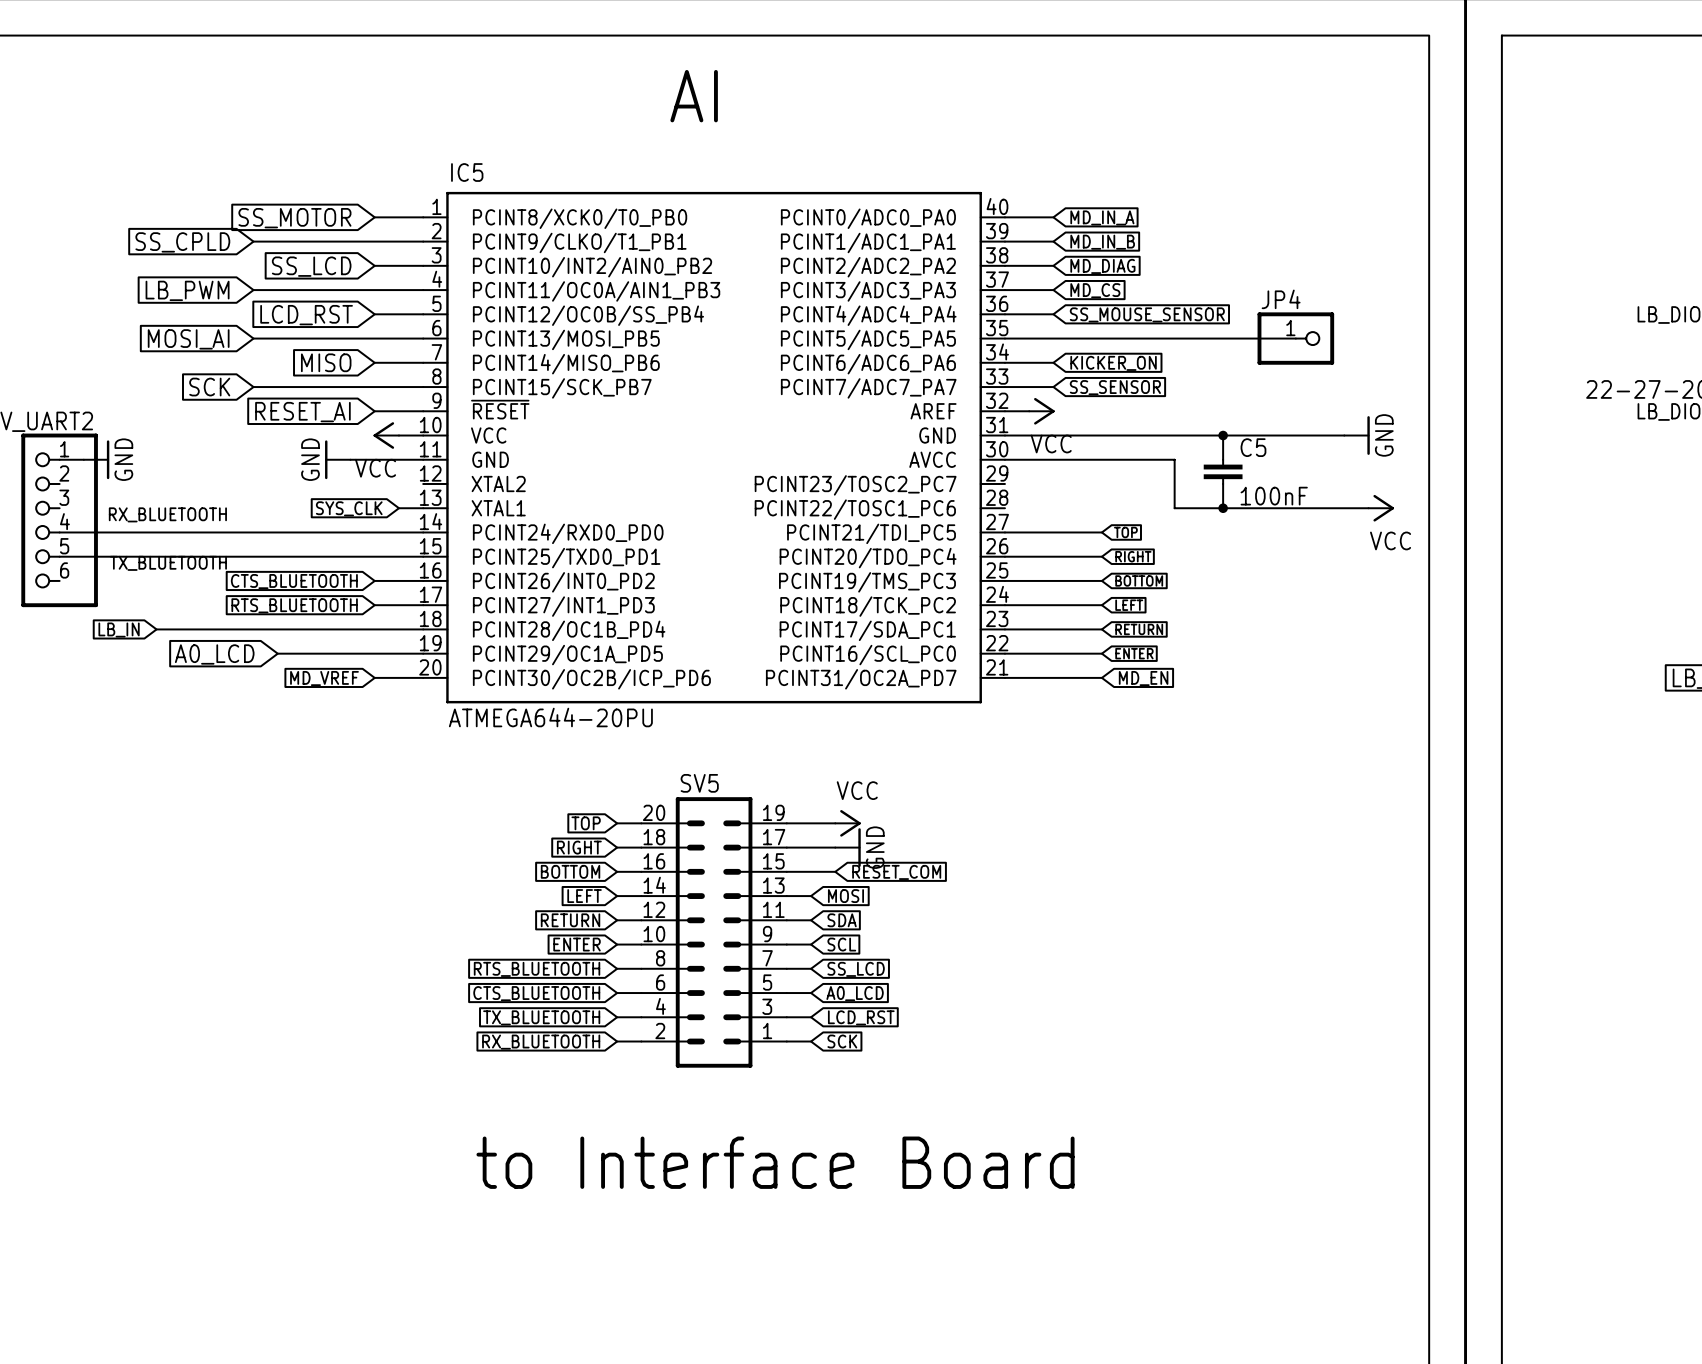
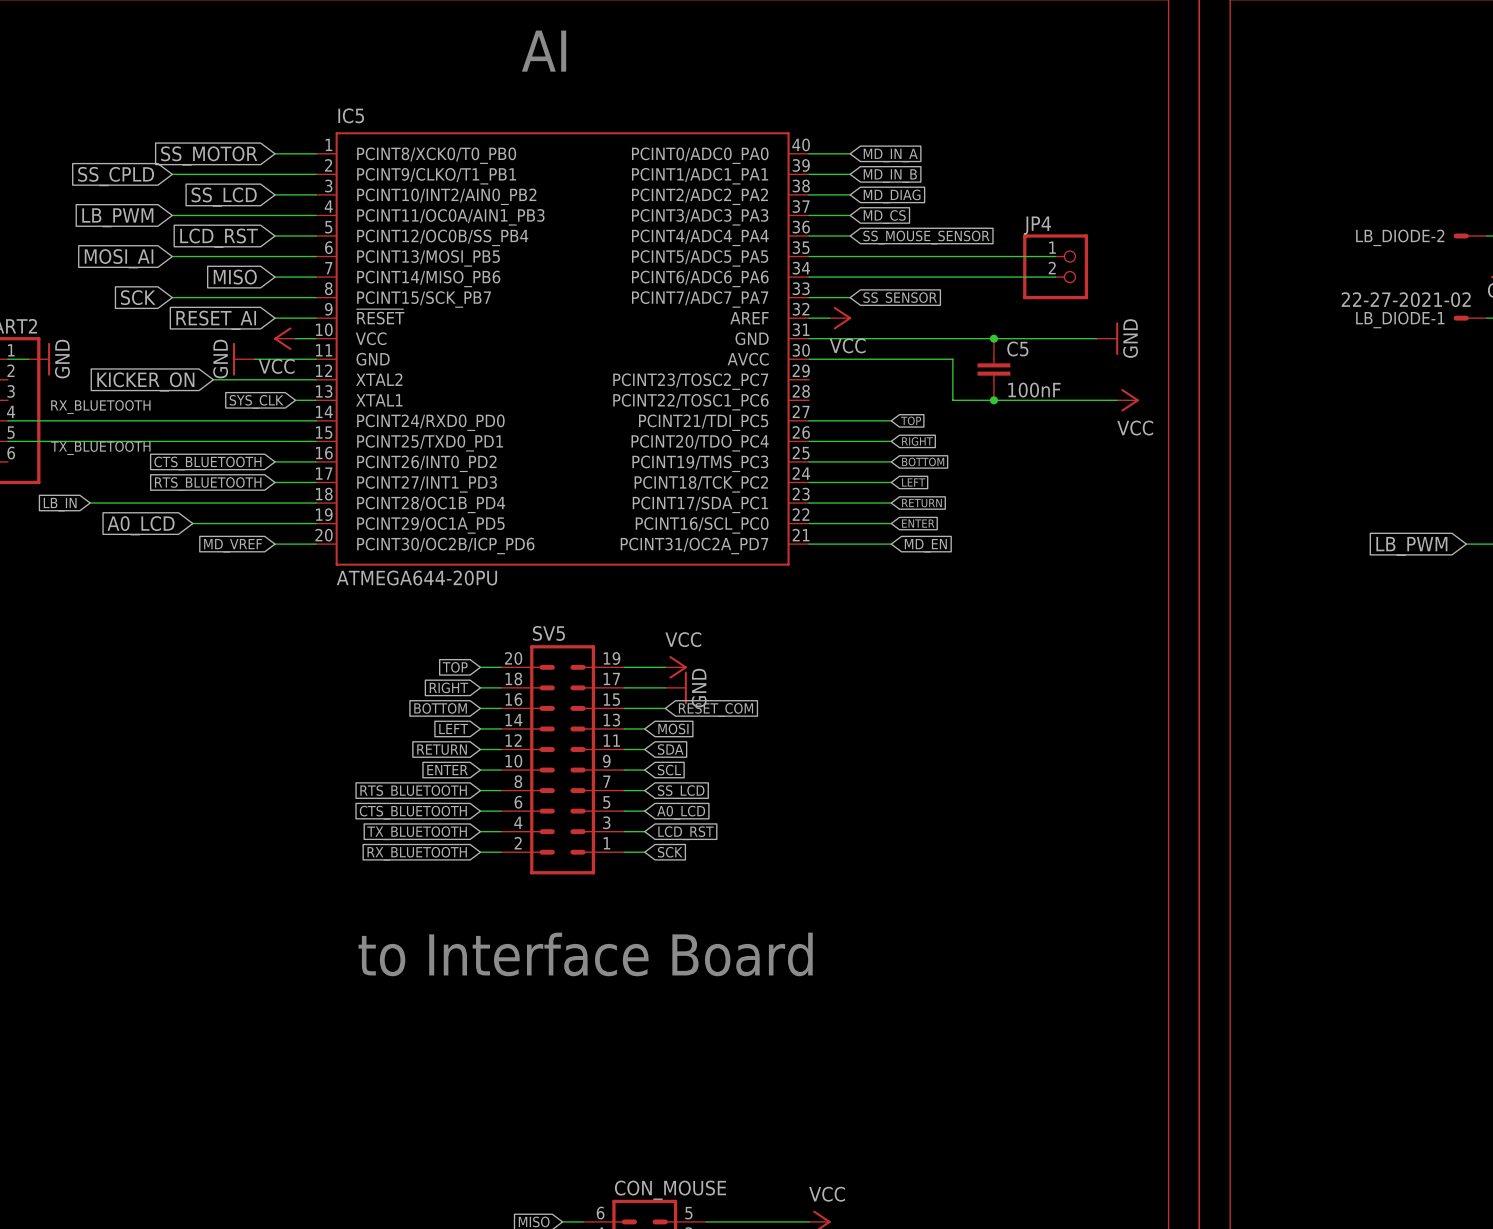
JP4 symbol: [1257, 312, 1335, 365] -> [1023, 234, 1089, 300]
wire: none -> (850, 277) (1055, 277)
global label: KICKER_ON (1113, 363) -> none
wire: none -> (213, 379) (316, 379)
global label: none -> KICKER_ON (145, 381)

